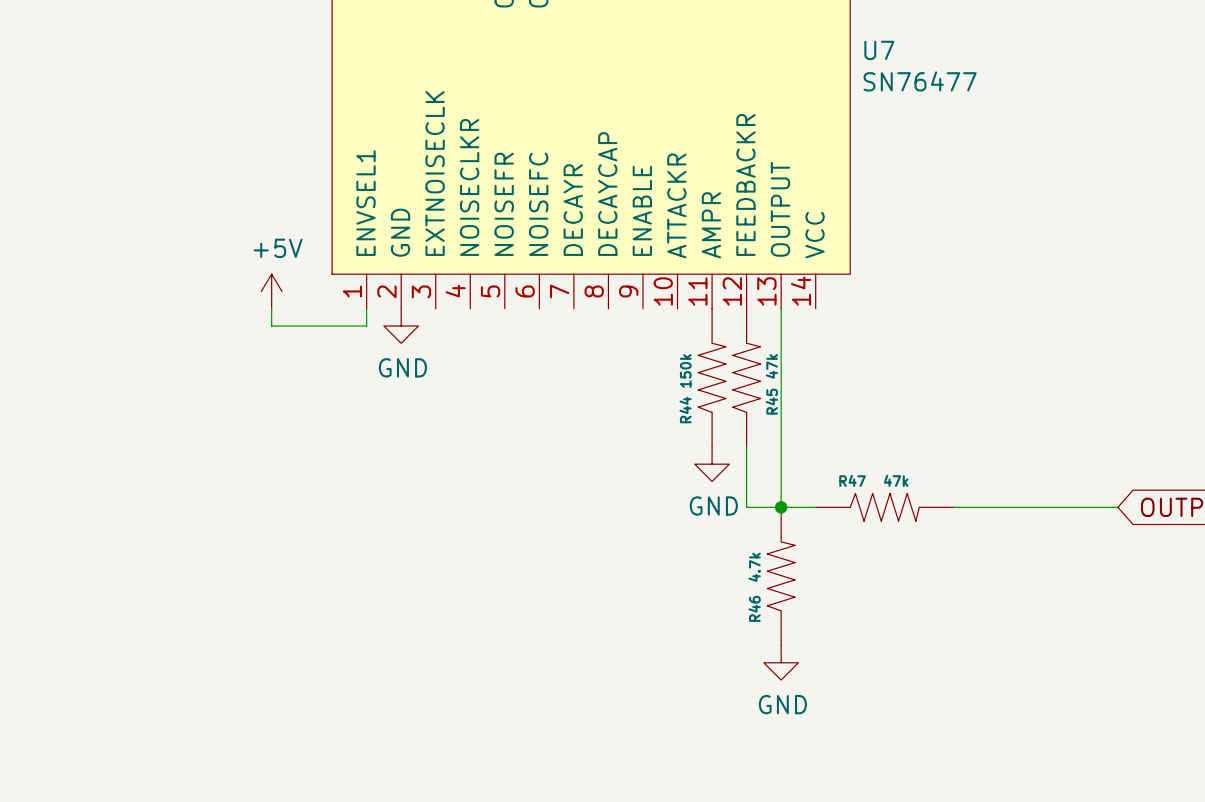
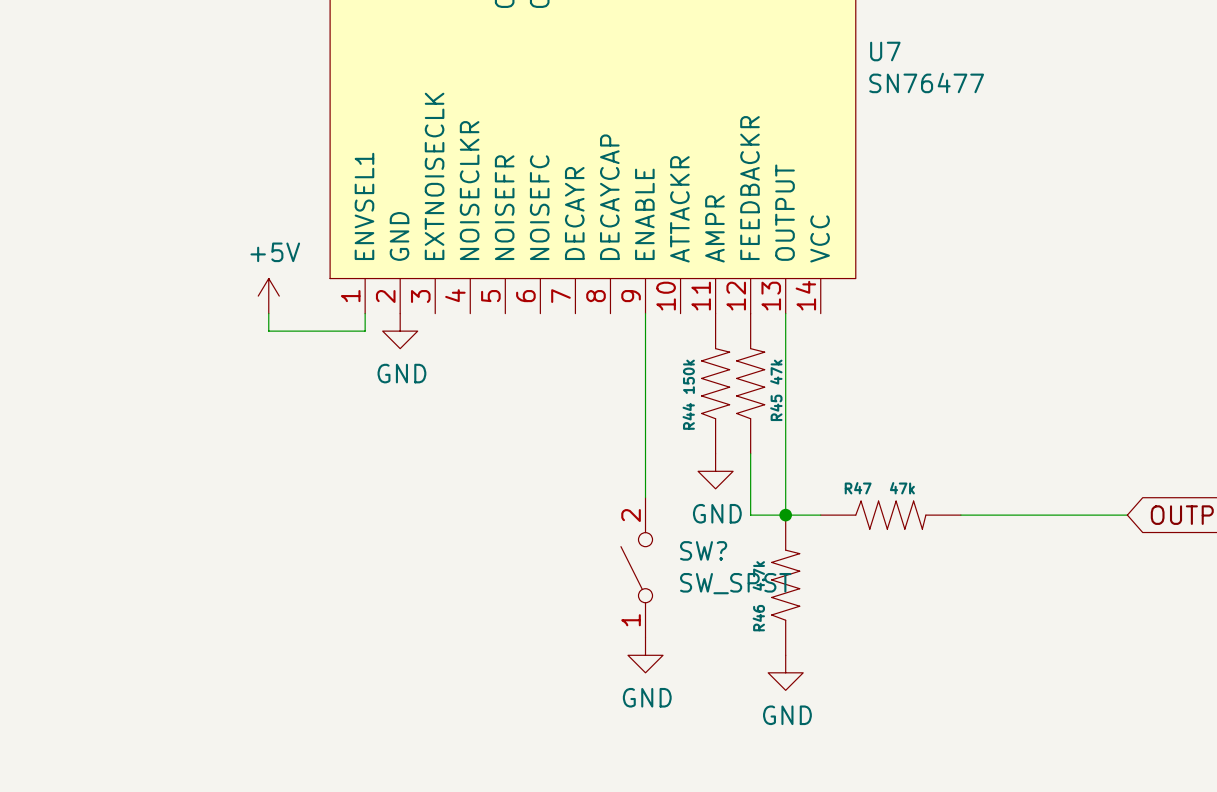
wire: none -> (645, 313) (645, 497)
SW?: none -> SW_SPST (636, 567)
power symbol: none -> GND (645, 655)

